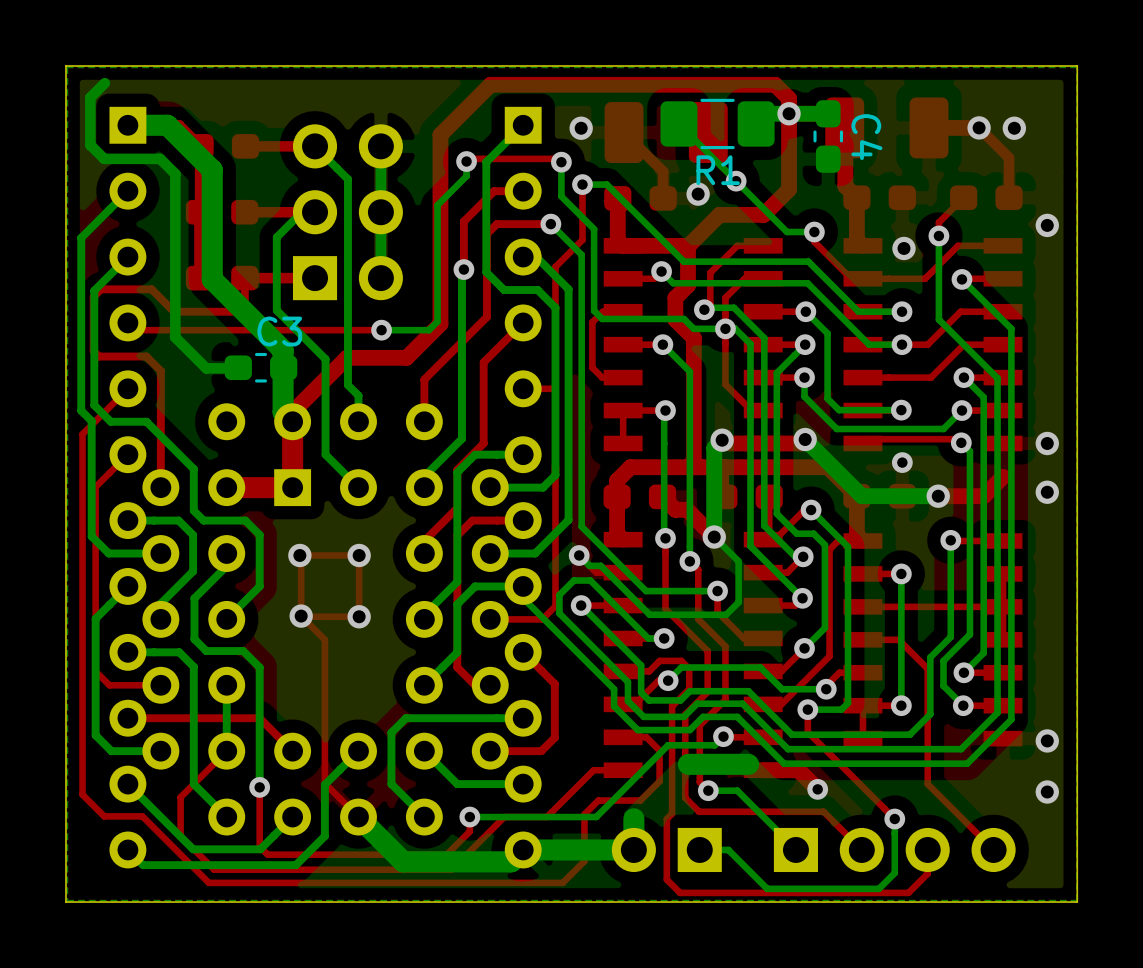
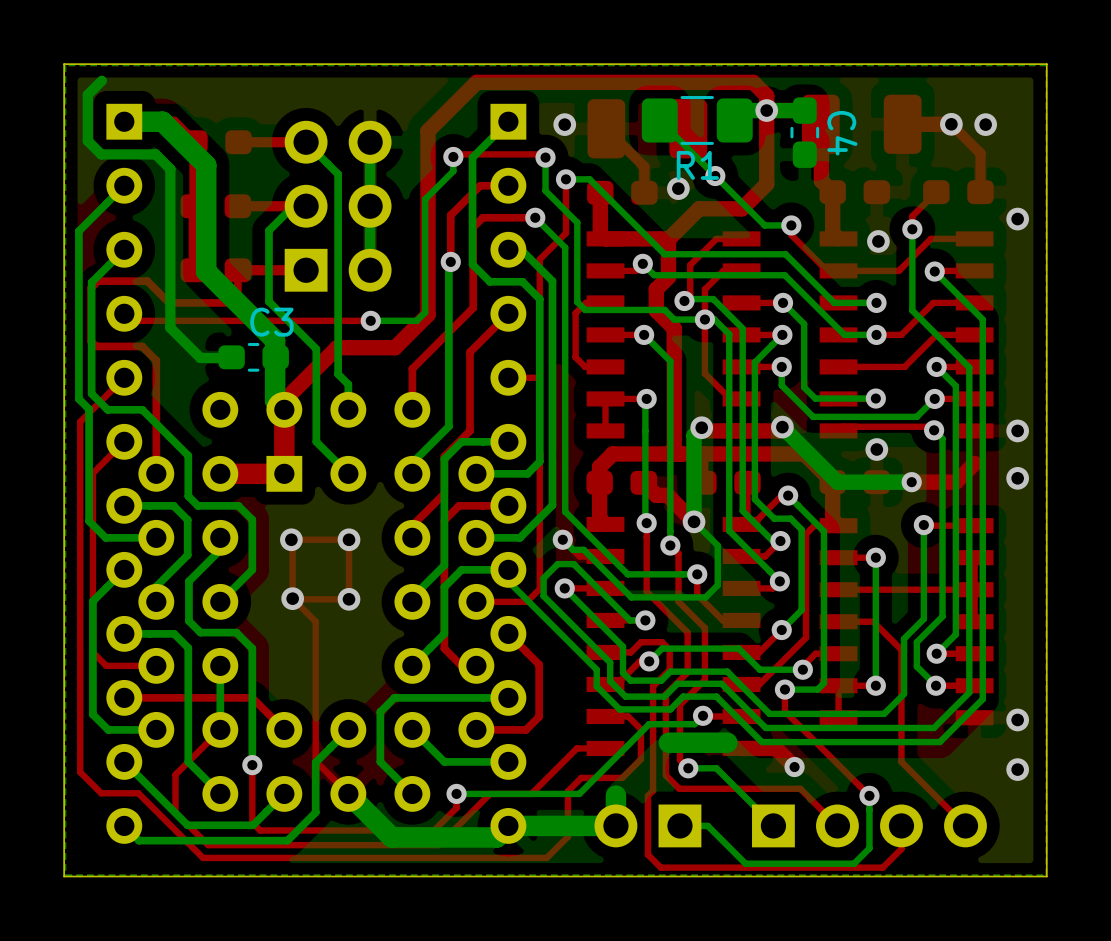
via position: (902, 462) -> (911, 482)
via position: (938, 496) -> (876, 449)

